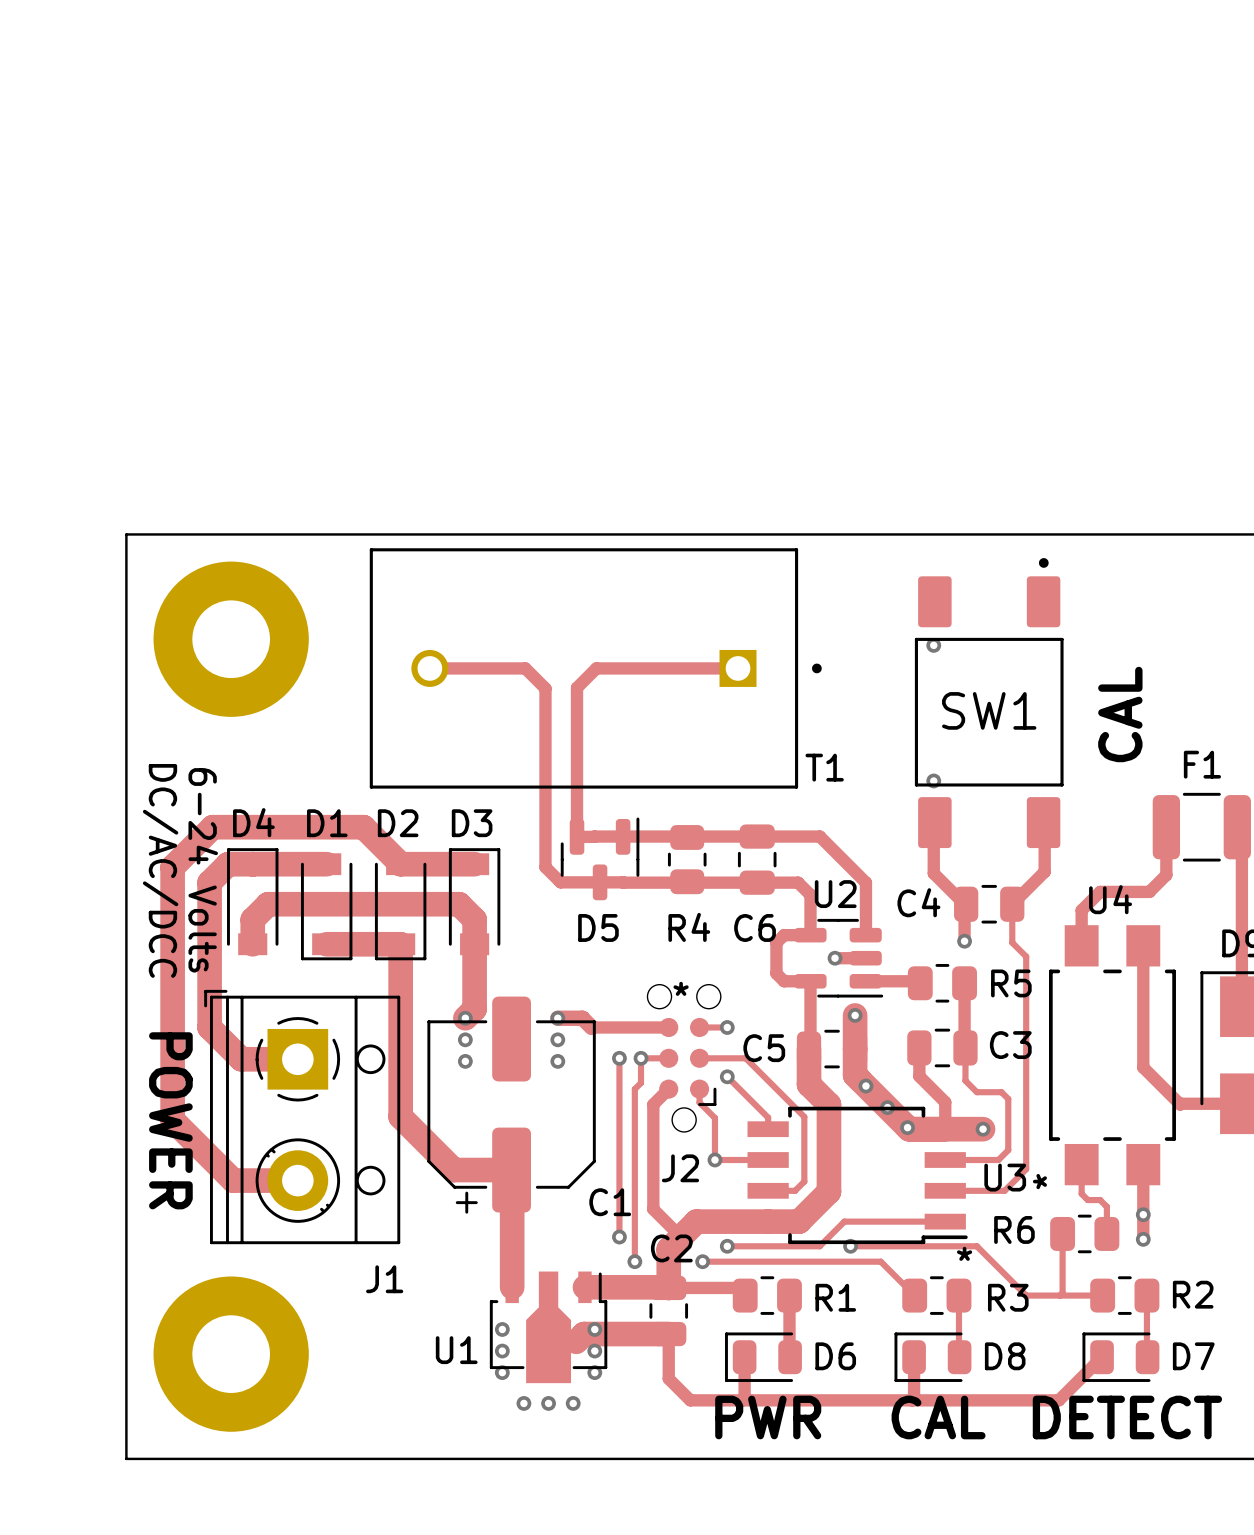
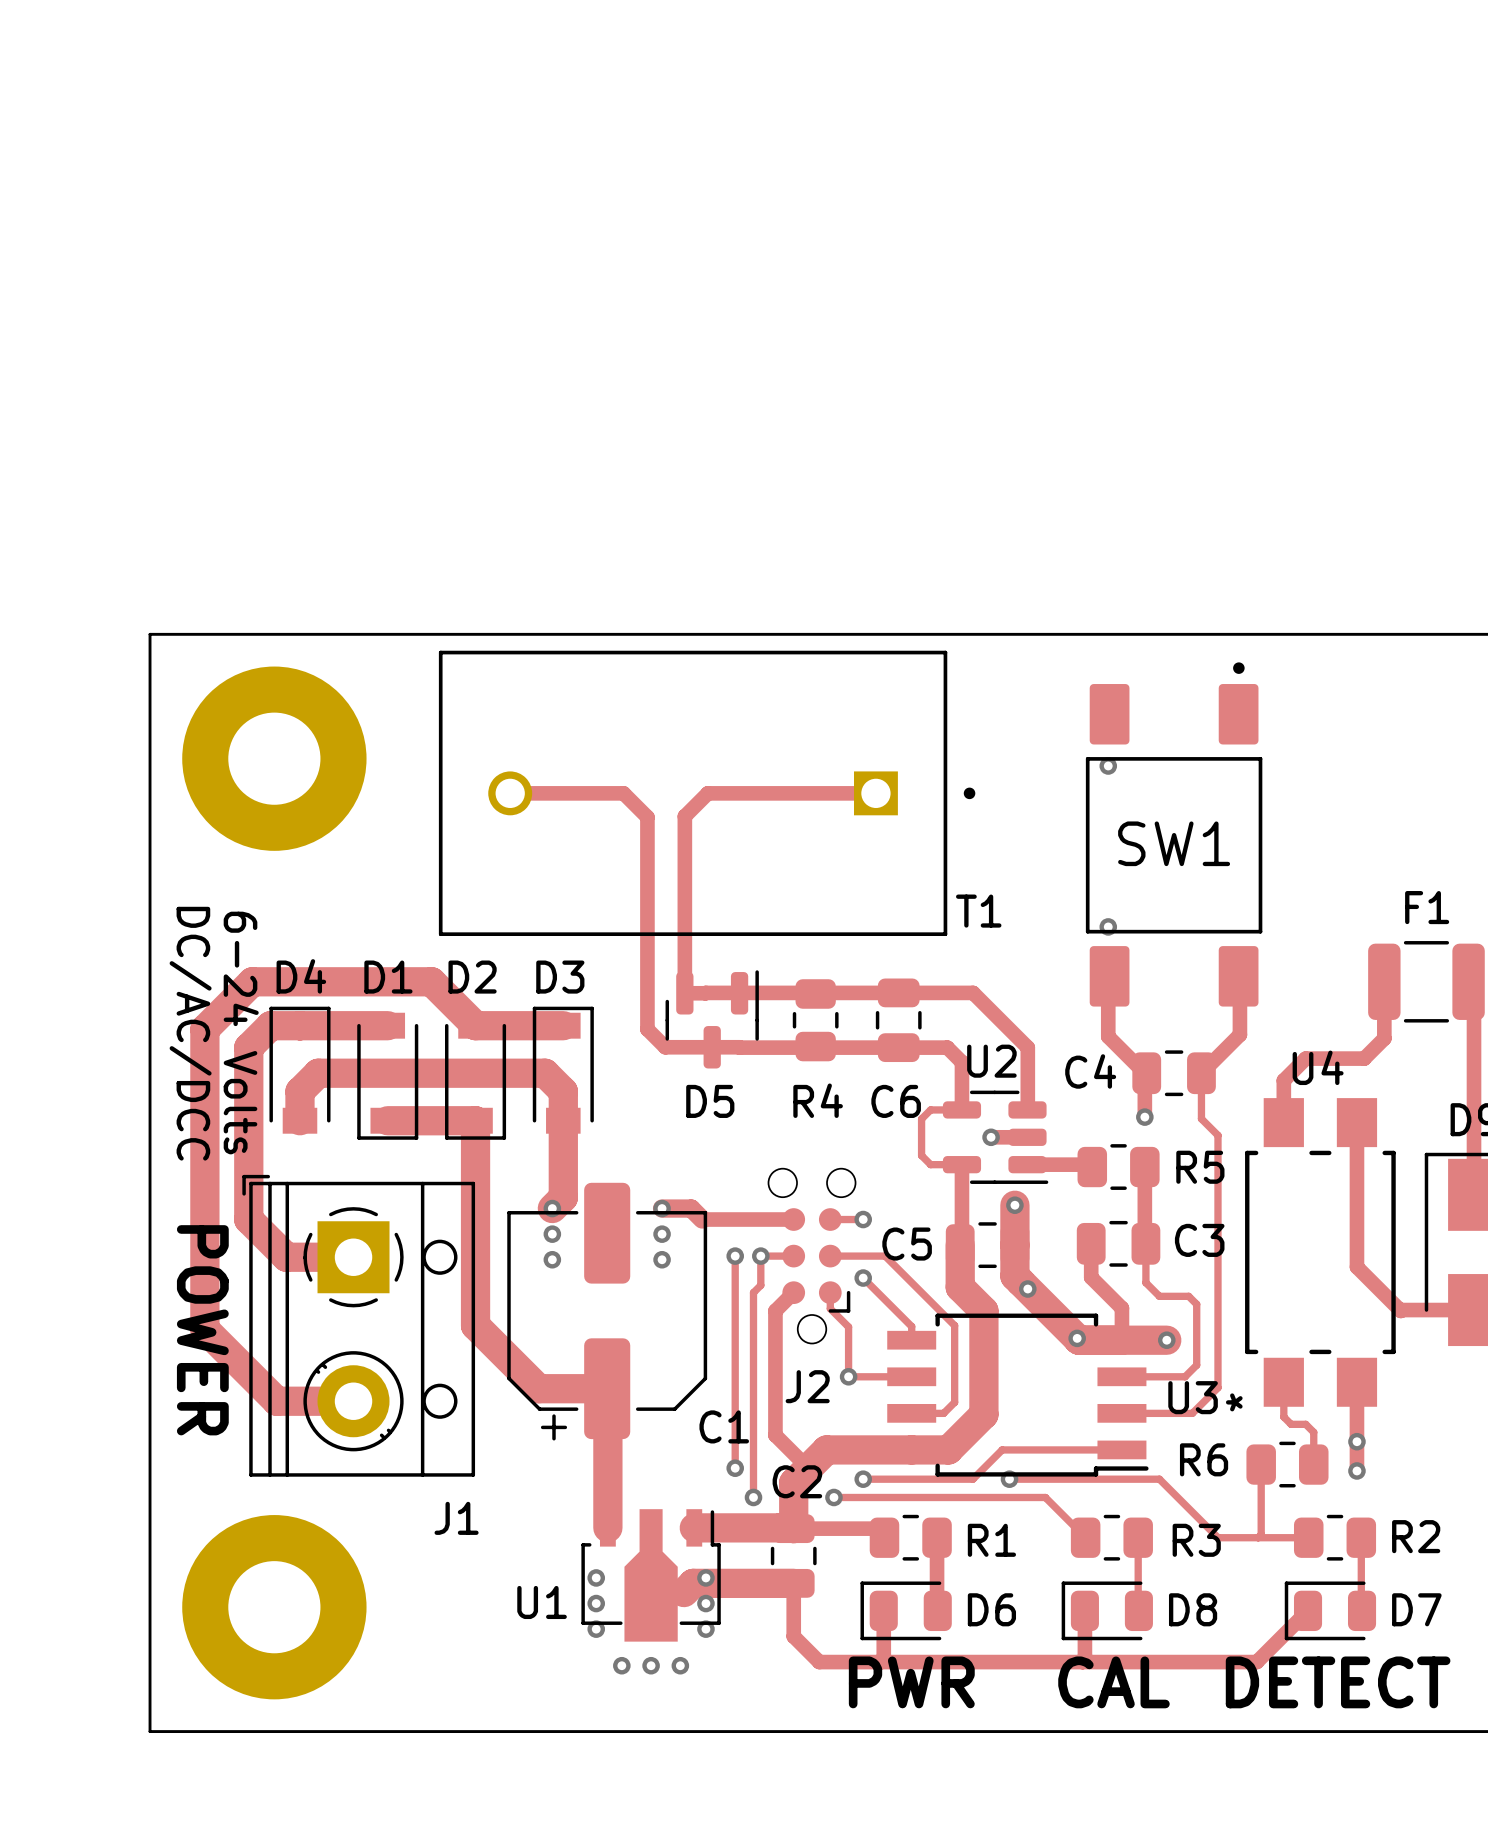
text: CAL (1120, 714) -> none
track width: thick (810, 935) (784, 935) (776, 942) (776, 973) (784, 981) (810, 981) -> thin (961, 1109) (930, 1109) (921, 1119) (921, 1155) (930, 1164) (961, 1164)
text: * (681, 988) -> none
via: (887, 1107) -> none
text: * (964, 1253) -> none

